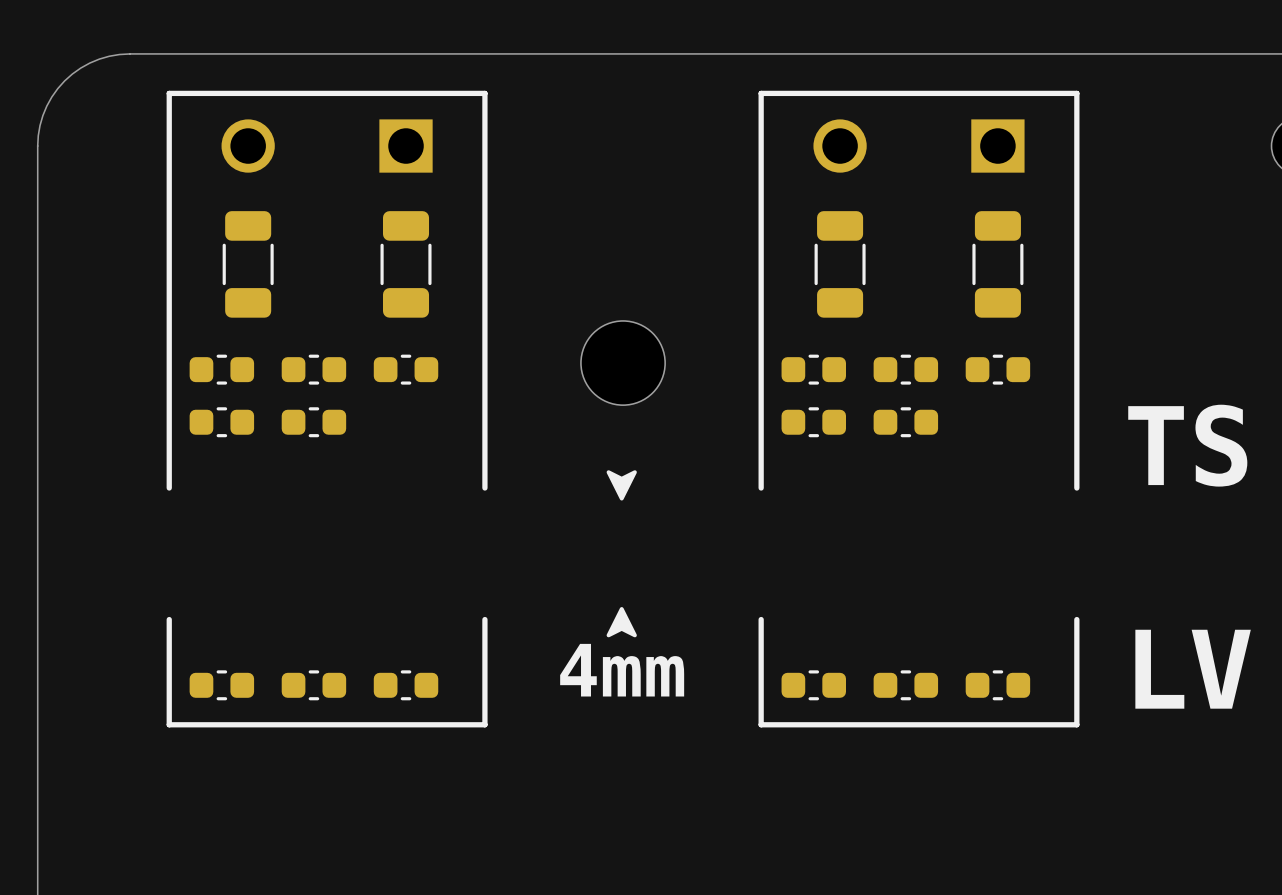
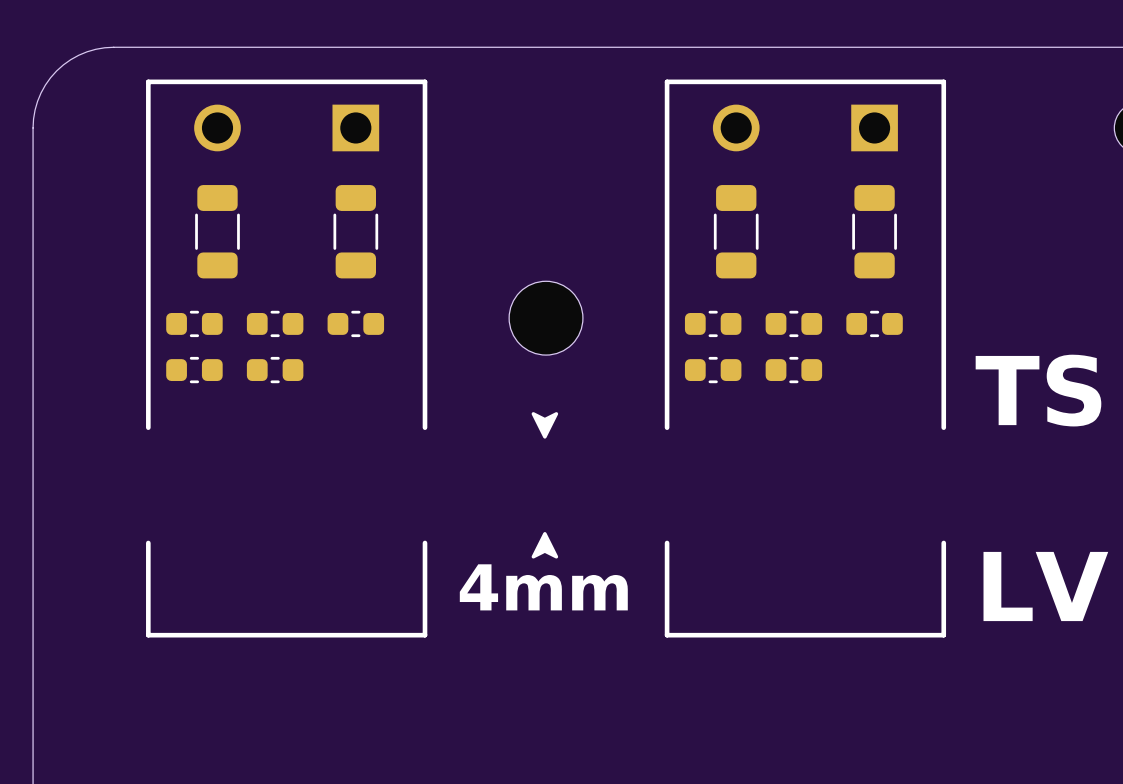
part: (221, 685) -> none
part: (313, 685) -> none
part: (406, 685) -> none
part: (813, 685) -> none
part: (905, 685) -> none
part: (997, 685) -> none

